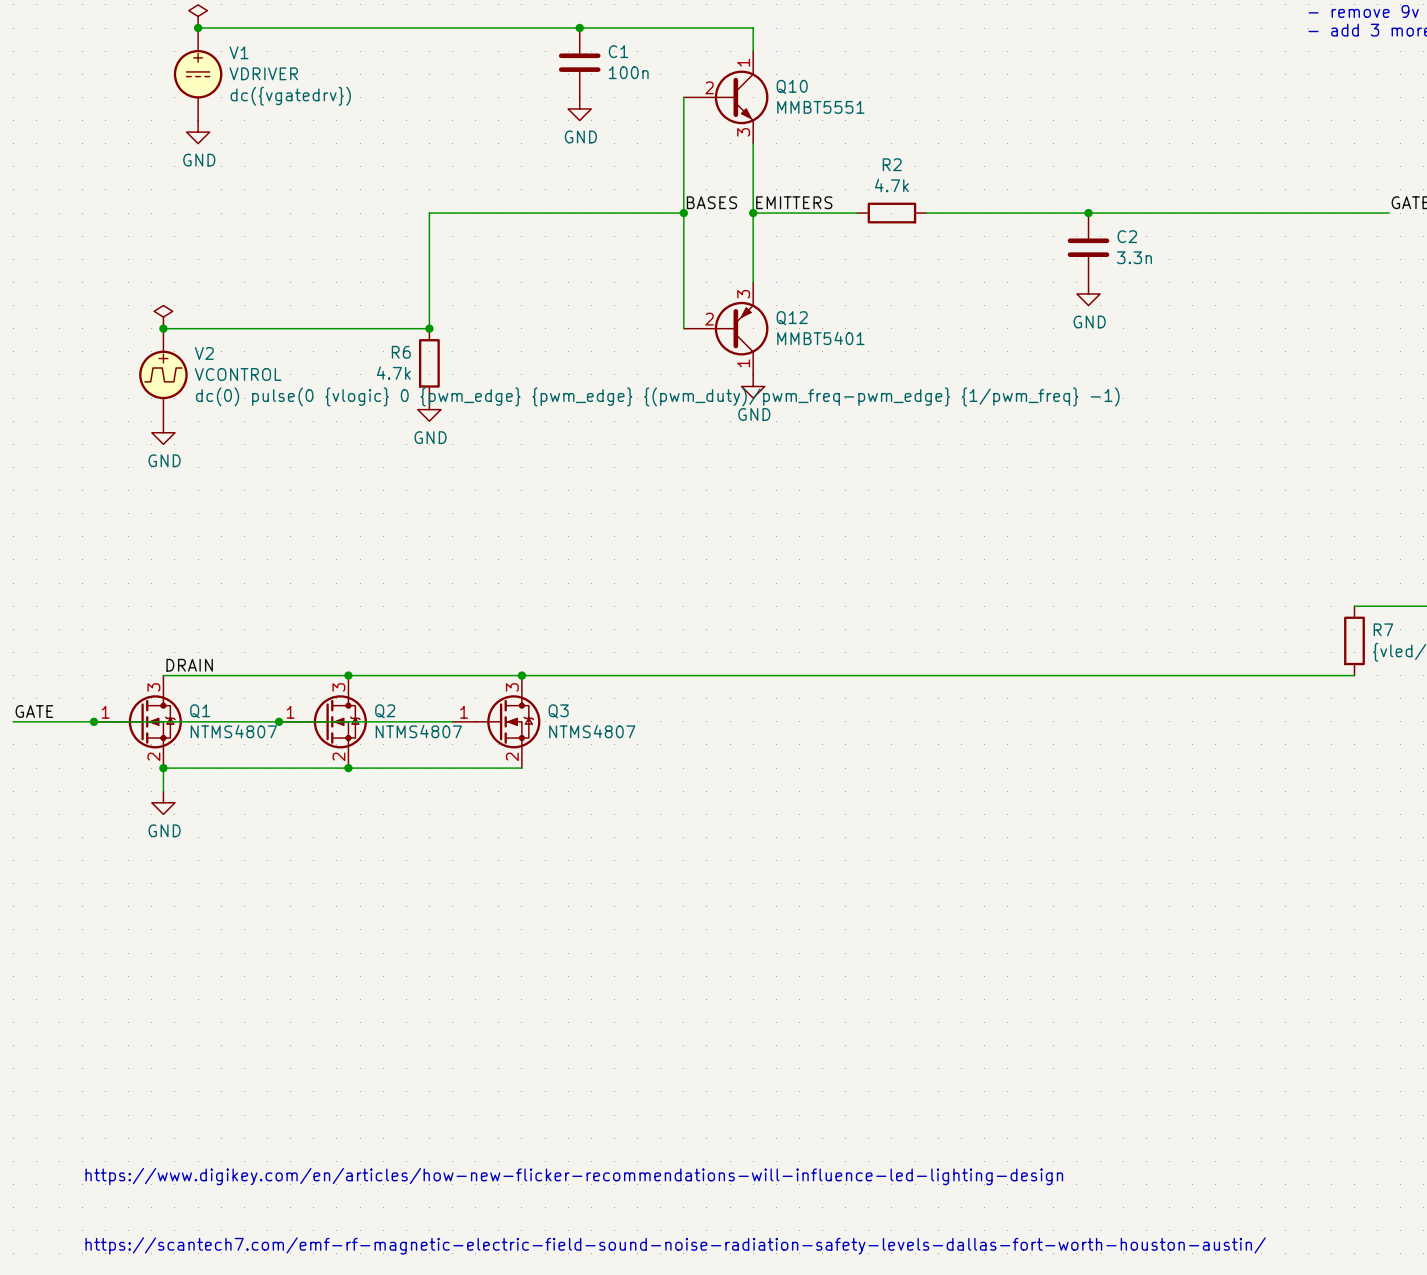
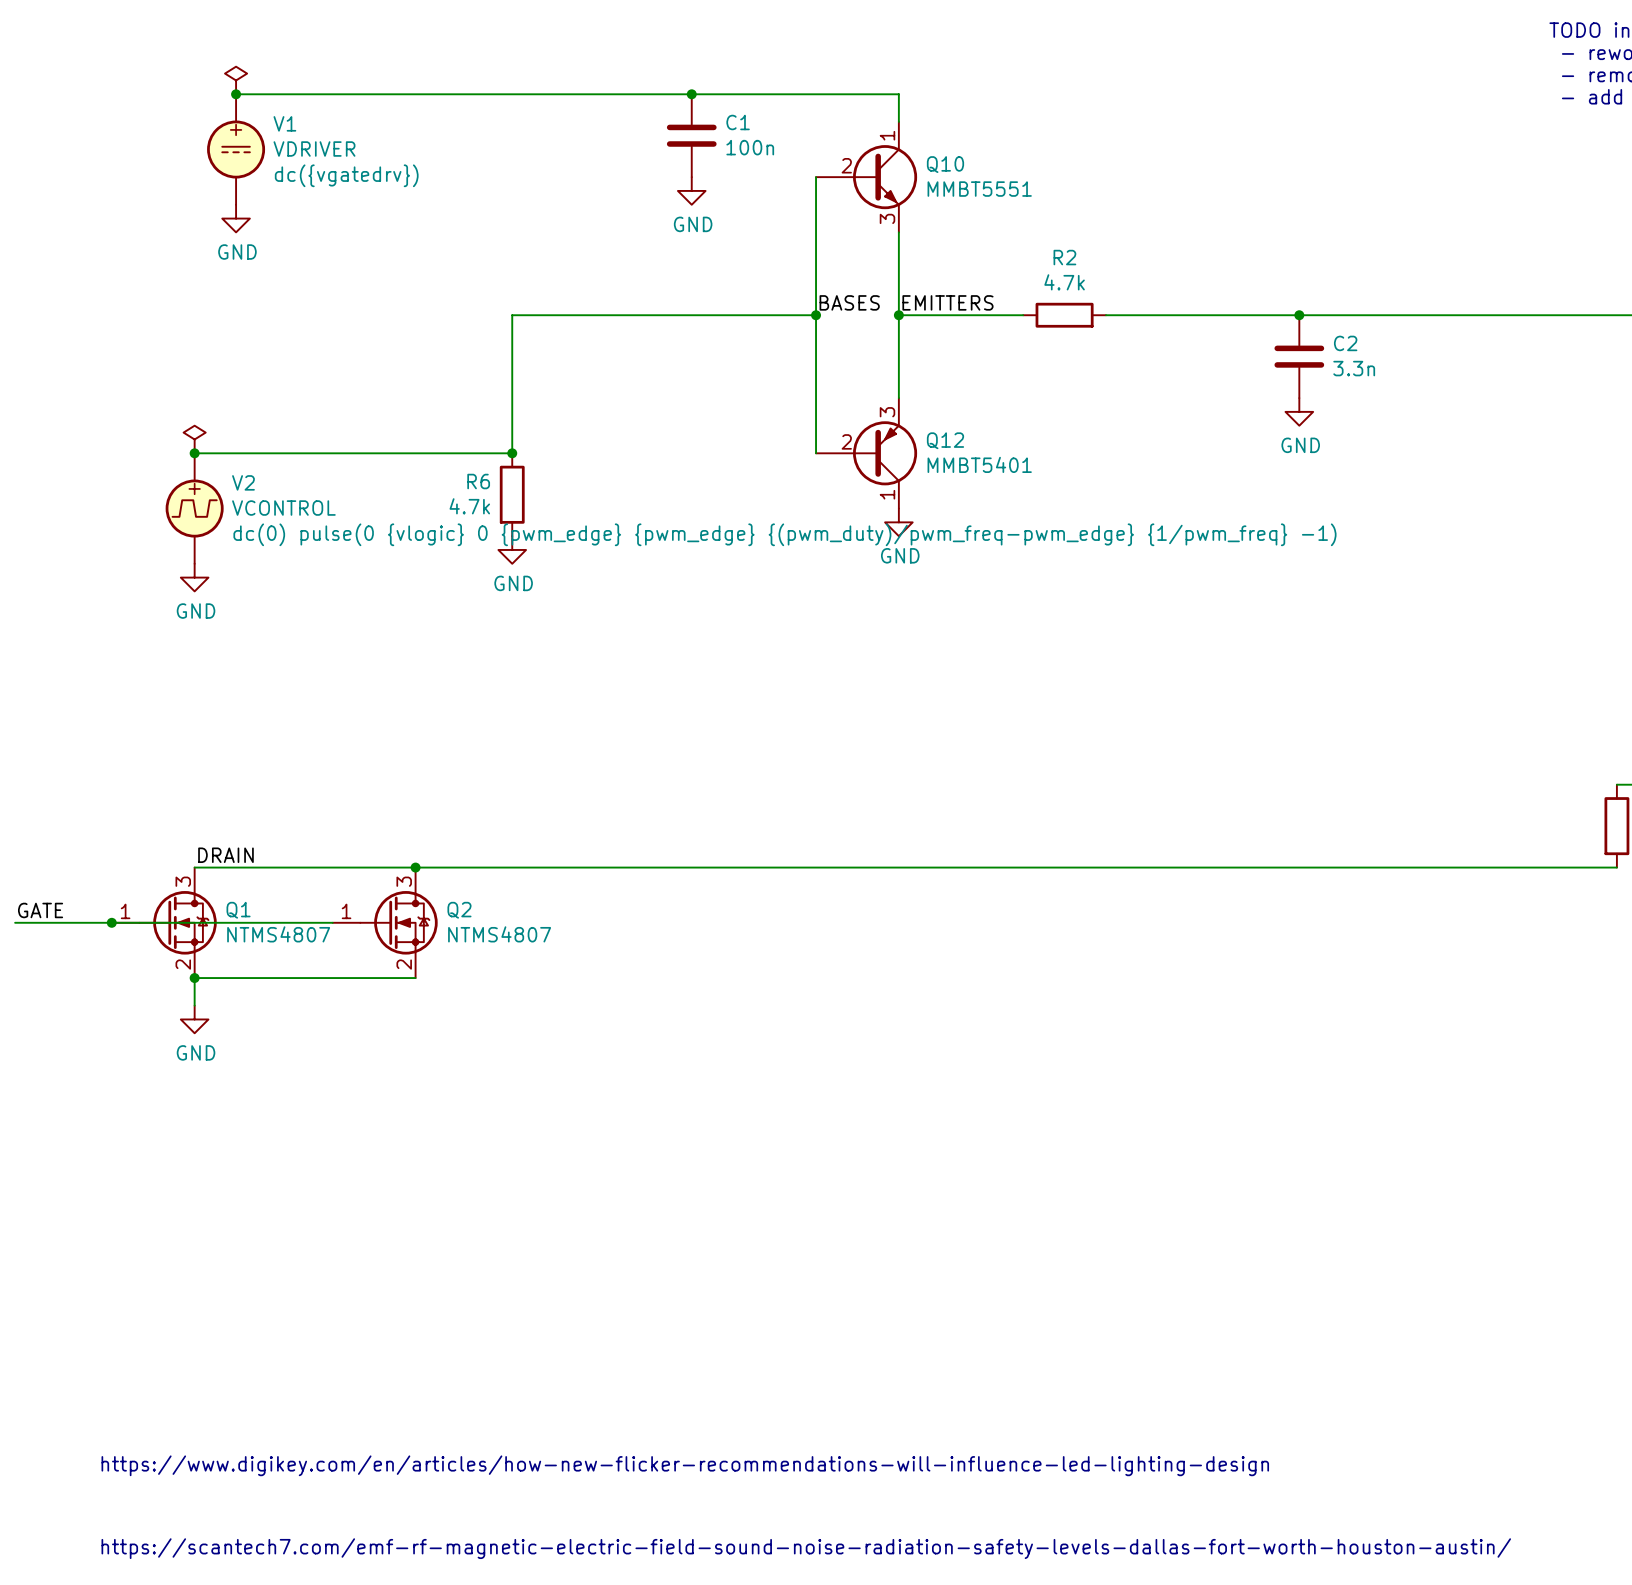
junction: (521, 675) -> none
wire: (279, 721) (452, 721) -> none
junction: (279, 721) -> none
Q3: NTMS4807 (496, 721) -> none
wire: (348, 768) (521, 768) -> none
junction: (348, 768) -> none

